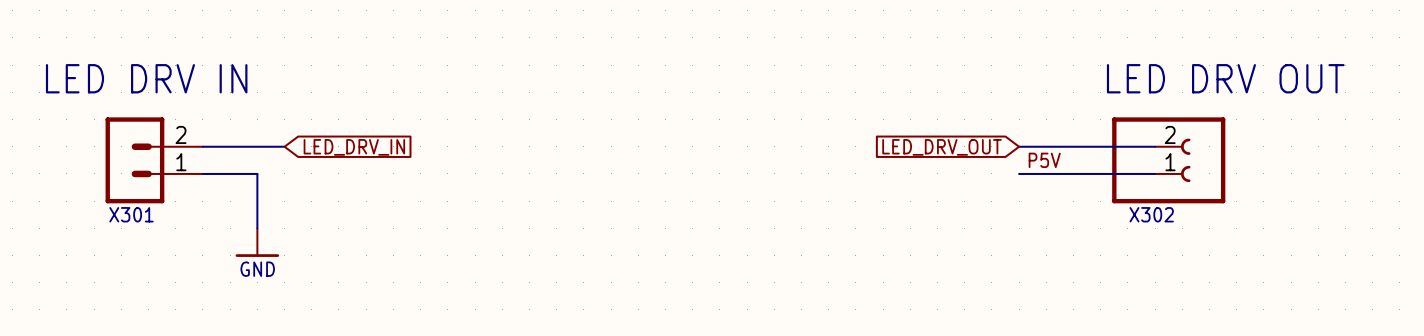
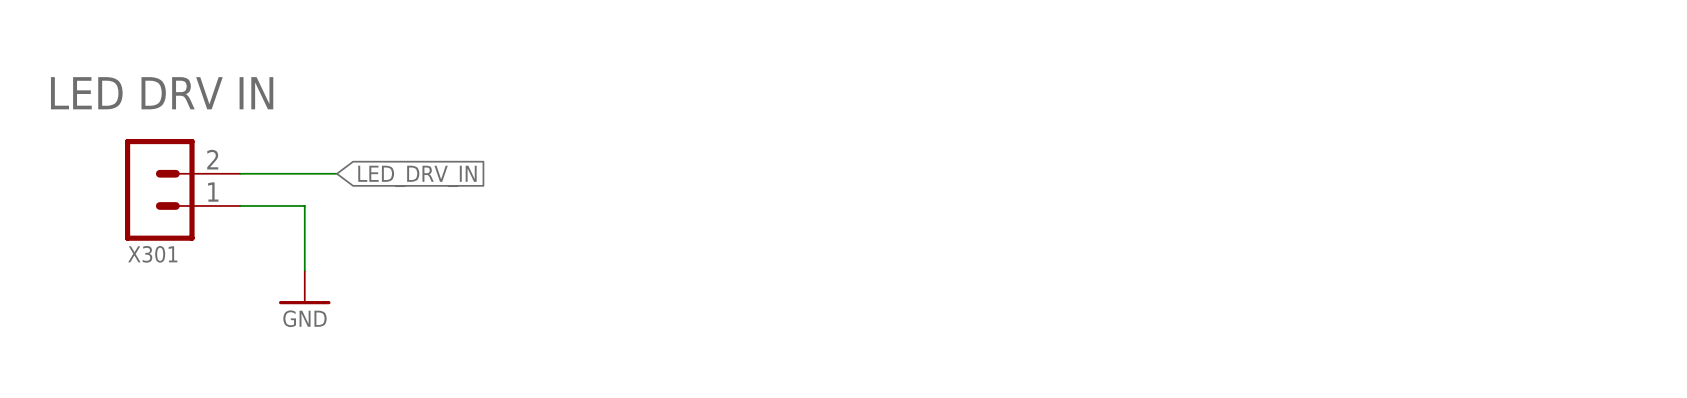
wire: (1019, 146) (1155, 146) -> none
global label: LED_DRV_OUT (942, 147) -> none
label: P5V (1044, 160) -> none
X302: (1168, 160) -> none
wire: (1019, 173) (1155, 173) -> none

